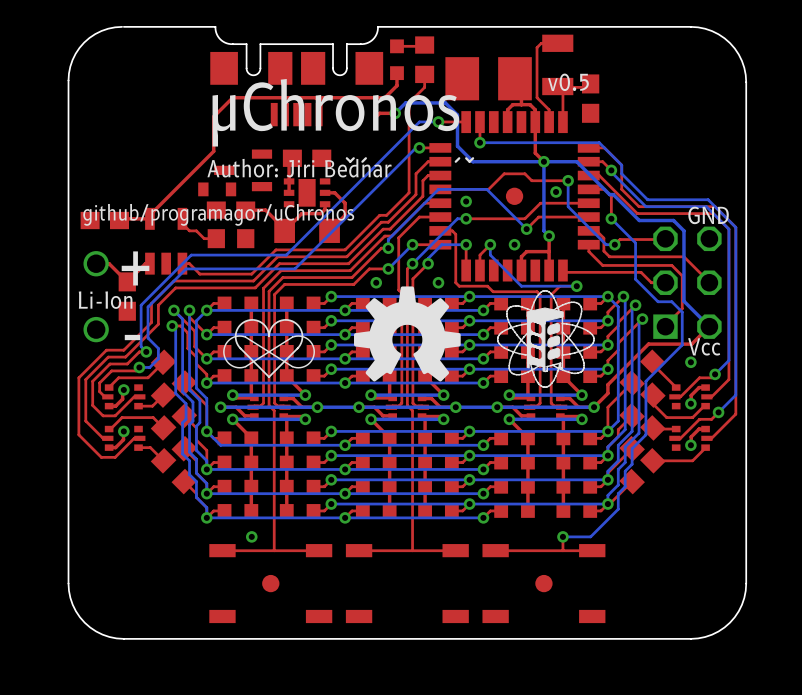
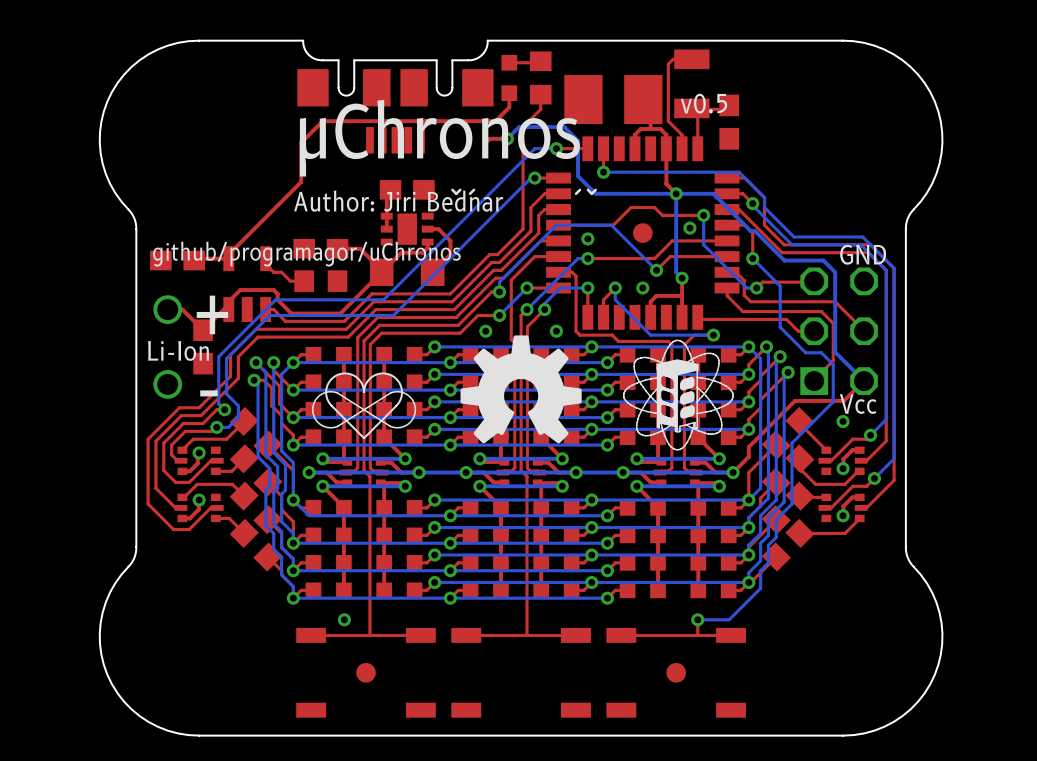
board edge: (122, 26) (108, 28) (89, 37) (79, 47) (70, 66) (68, 80) (68, 192) -> (199, 40) (167, 45) (139, 60) (117, 82) (103, 111) (100, 132) (102, 163) (115, 192) (133, 216) (136, 229)
board edge: (690, 26) (705, 28) (724, 38) (738, 54) (744, 67) (746, 82) (746, 192) -> (843, 40) (874, 45) (902, 60) (924, 82) (938, 111) (942, 132) (939, 163) (926, 192) (908, 216) (905, 229)
part: (243, 170) -> none
part: (217, 189) -> none
top track: none -> (381, 272) (340, 313) (291, 313) (277, 299) (277, 293) (273, 289) (240, 289) (230, 299) (228, 309)
board edge: (68, 472) (68, 583) (70, 597) (75, 611) (90, 627) (109, 637) (123, 638) -> (136, 547) (133, 560) (115, 583) (102, 612) (100, 644) (103, 664) (117, 693) (139, 716) (167, 730) (199, 735)
board edge: (746, 472) (746, 583) (744, 597) (738, 611) (724, 627) (705, 637) (690, 638) -> (905, 547) (908, 560) (926, 583) (939, 612) (942, 644) (938, 664) (924, 693) (902, 716) (874, 730) (843, 735)

